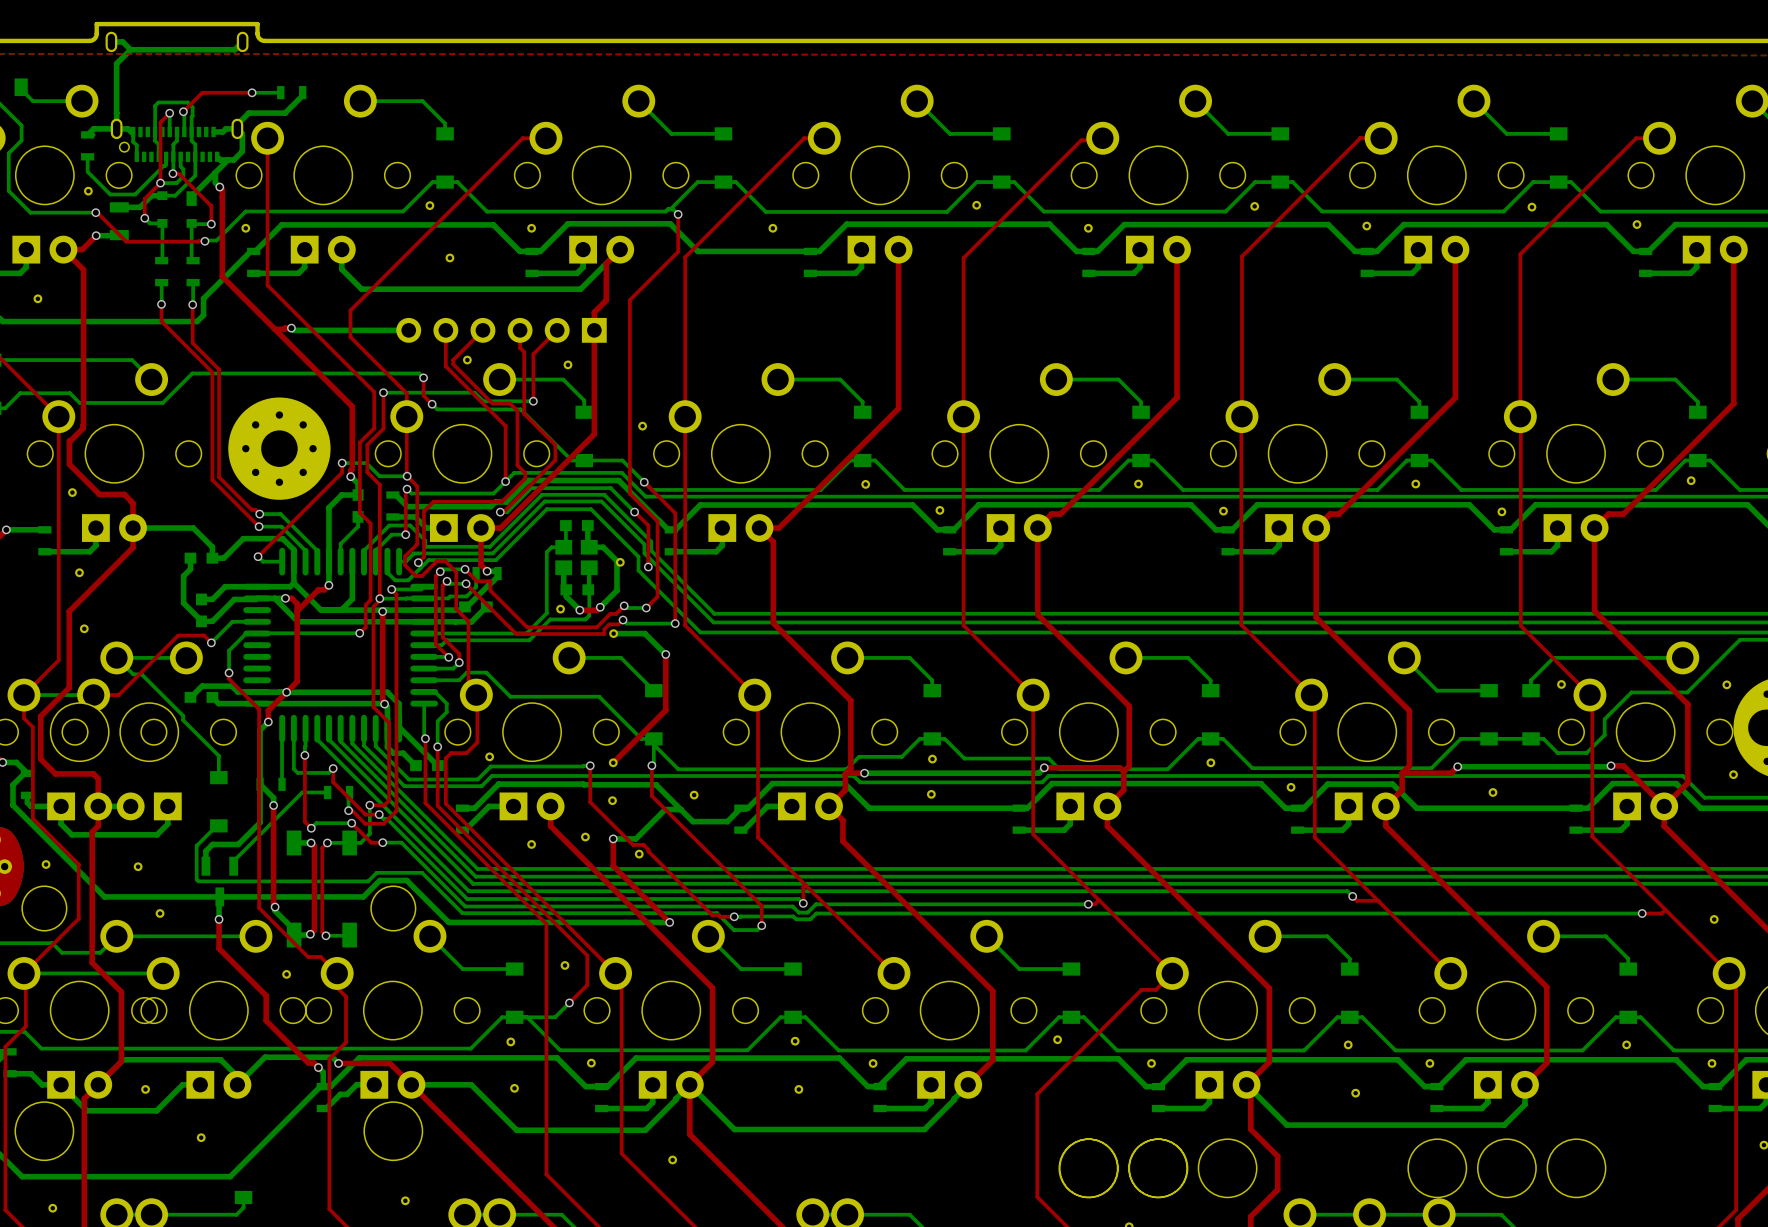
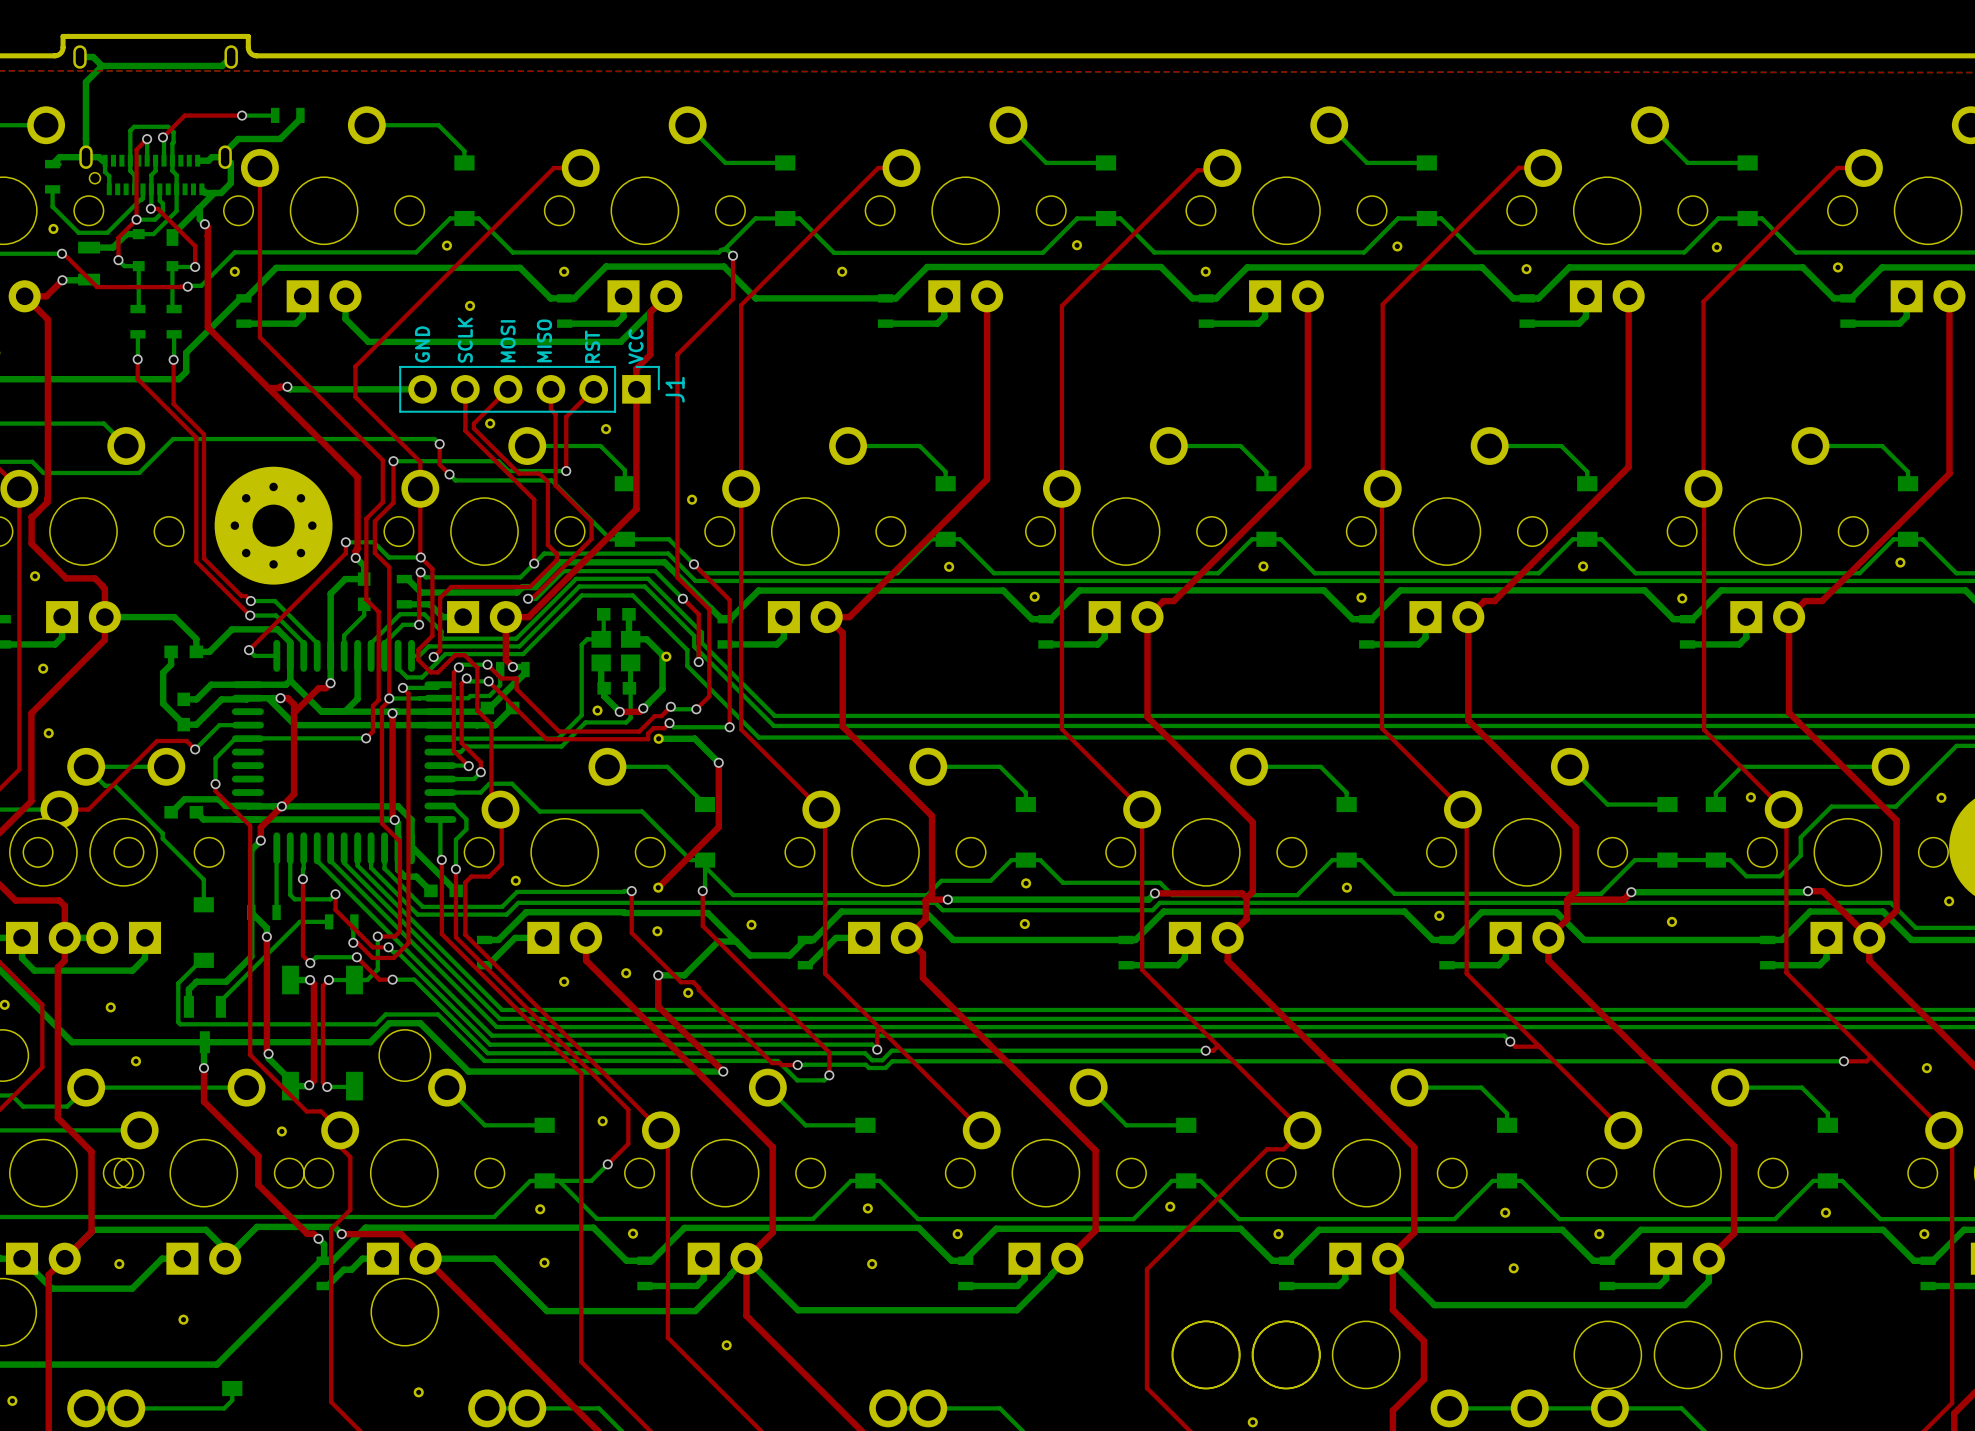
text: none -> SCLK (465, 340)
text: none -> MOSI (508, 341)
text: none -> MISO (544, 340)
text: none -> GND (422, 344)
text: none -> RST (592, 346)
text: none -> VCC (635, 346)
J1 side: bottom (501, 330) -> top (529, 389)

